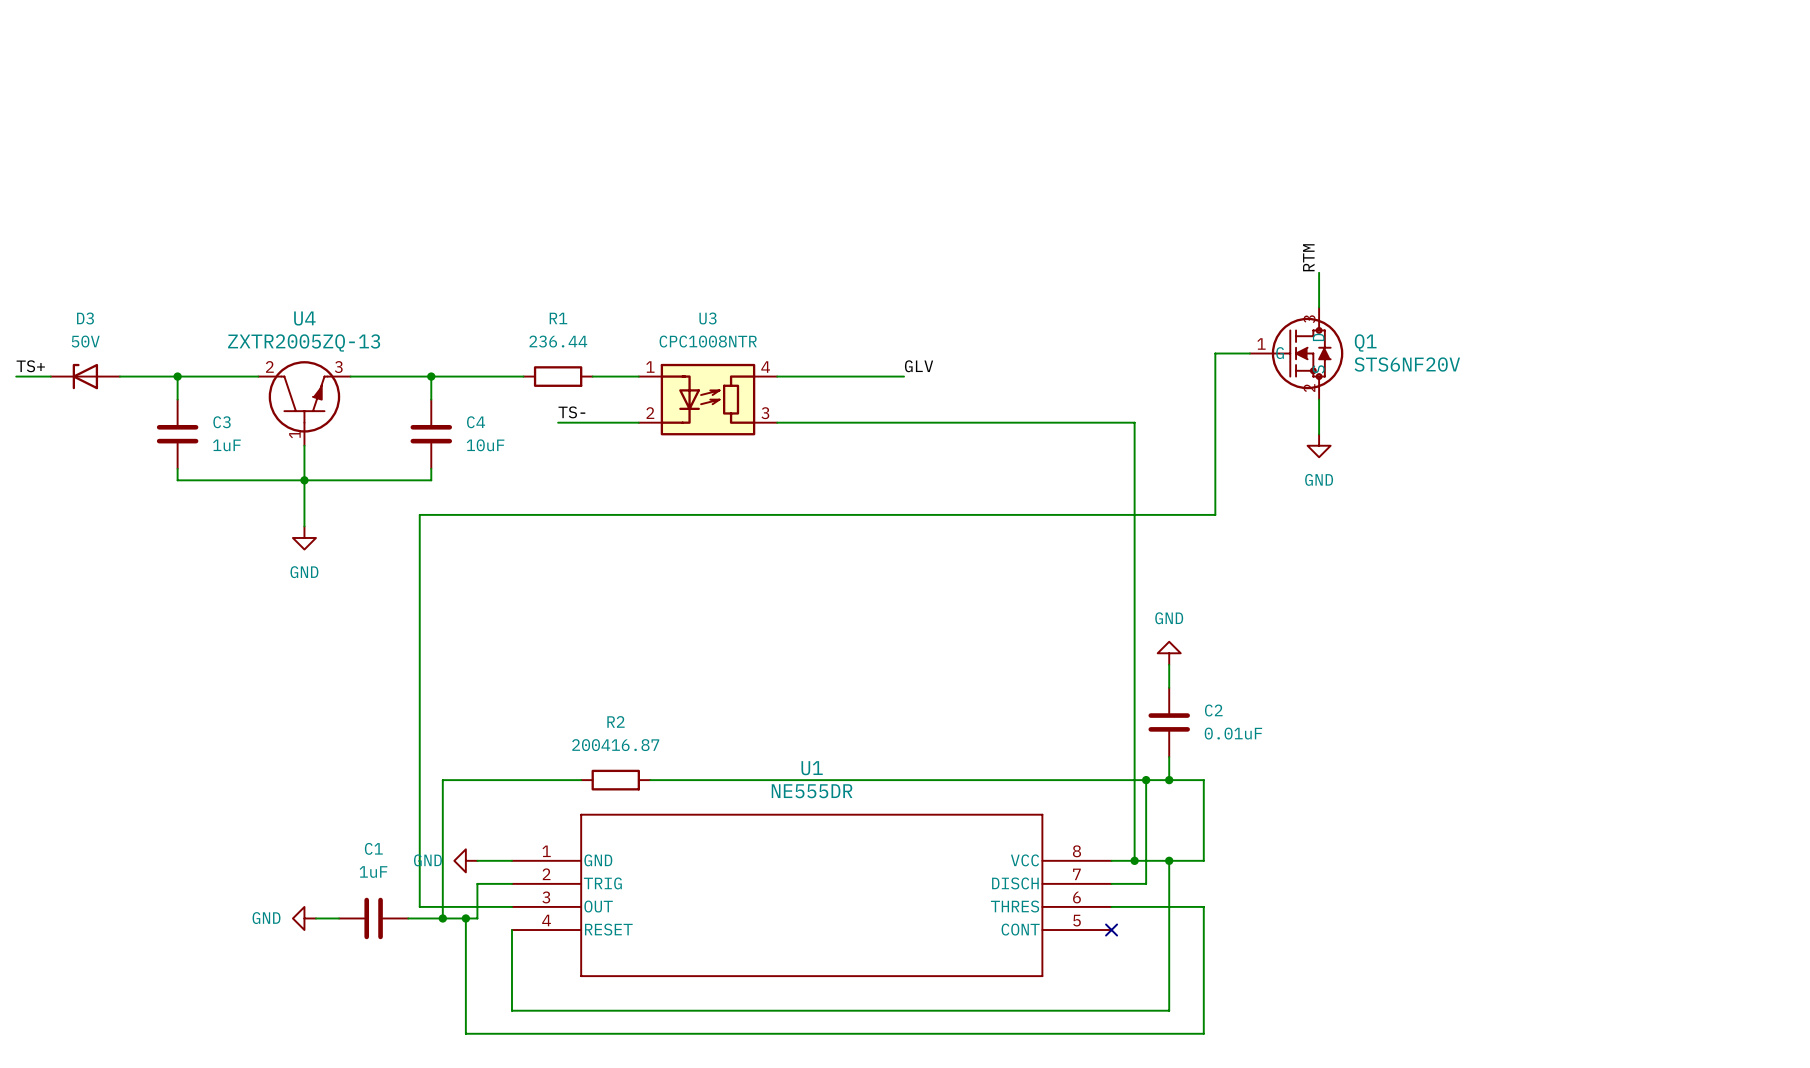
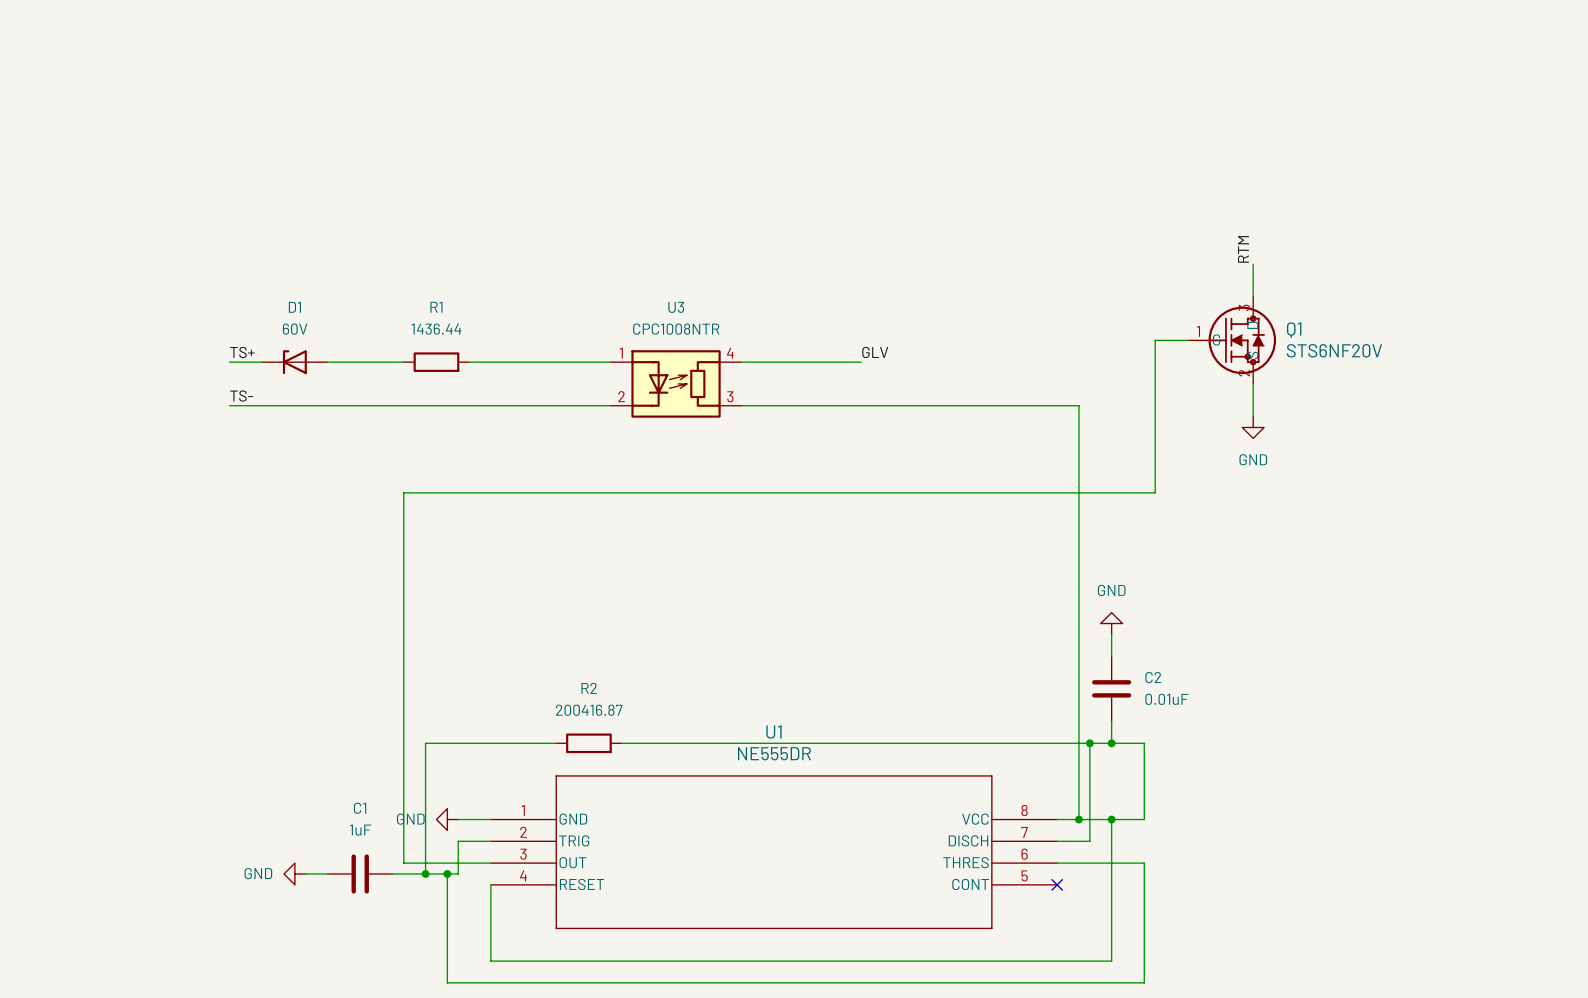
R1 value: 236.44 (558, 341) -> 1436.44 (436, 329)
label position: TS+ (30, 366) -> TS+ (242, 352)
wire: (16, 376) (50, 376) -> none
D3: 50V (85, 376) -> none
wire: (119, 376) (235, 376) -> none
wire: (177, 376) (177, 399) -> none
junction: (177, 376) -> none
D1: none -> 60V (294, 362)
wire: (419, 376) (488, 376) -> (501, 362) (567, 362)
wire: (431, 376) (431, 399) -> none
junction: (431, 376) -> none
R1 position: (558, 376) -> (436, 362)
U4: ZXTR2005ZQ-13 (304, 403) -> none
label: none -> TS- (241, 396)
label: TS- (571, 412) -> none
wire: none -> (229, 405) (534, 405)
C3: 1uF (177, 434) -> none
C4: 10uF (431, 434) -> none
wire: (304, 445) (304, 526) -> none
wire: (177, 468) (177, 480) (431, 480) (431, 468) -> none
junction: (304, 480) -> none
power symbol: GND (304, 537) -> none

